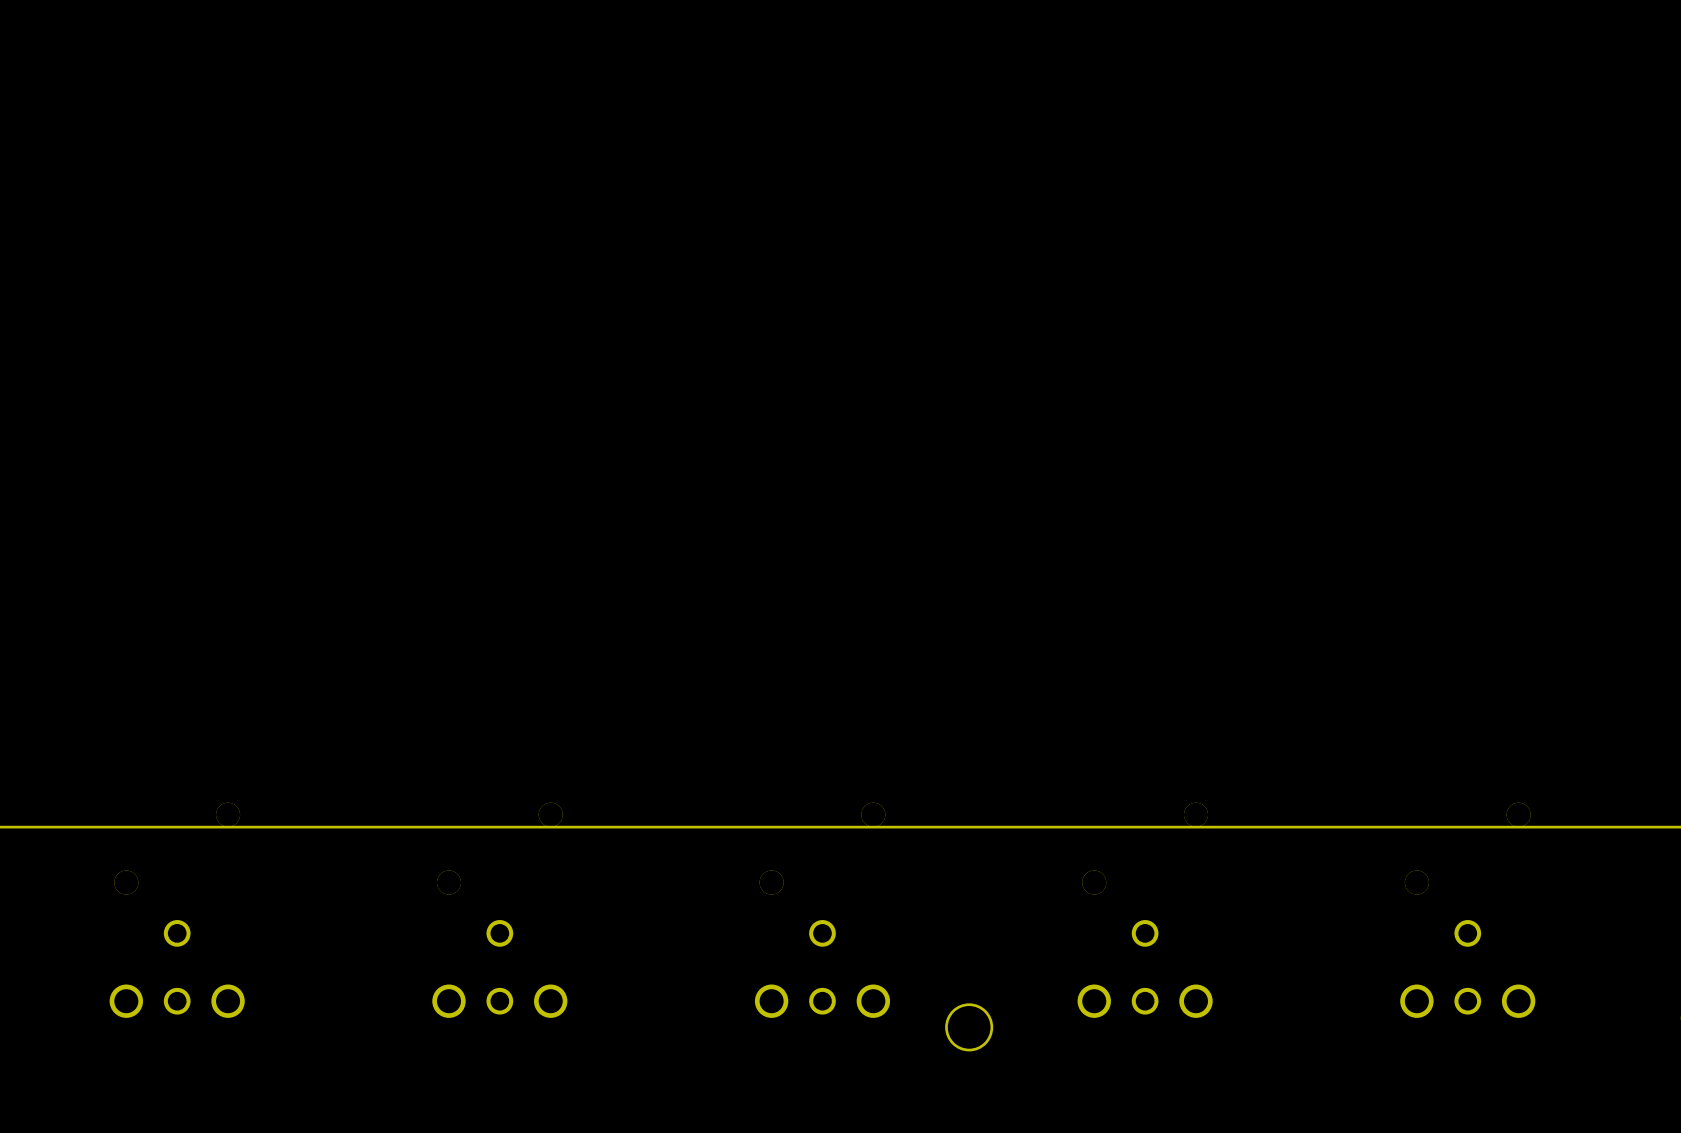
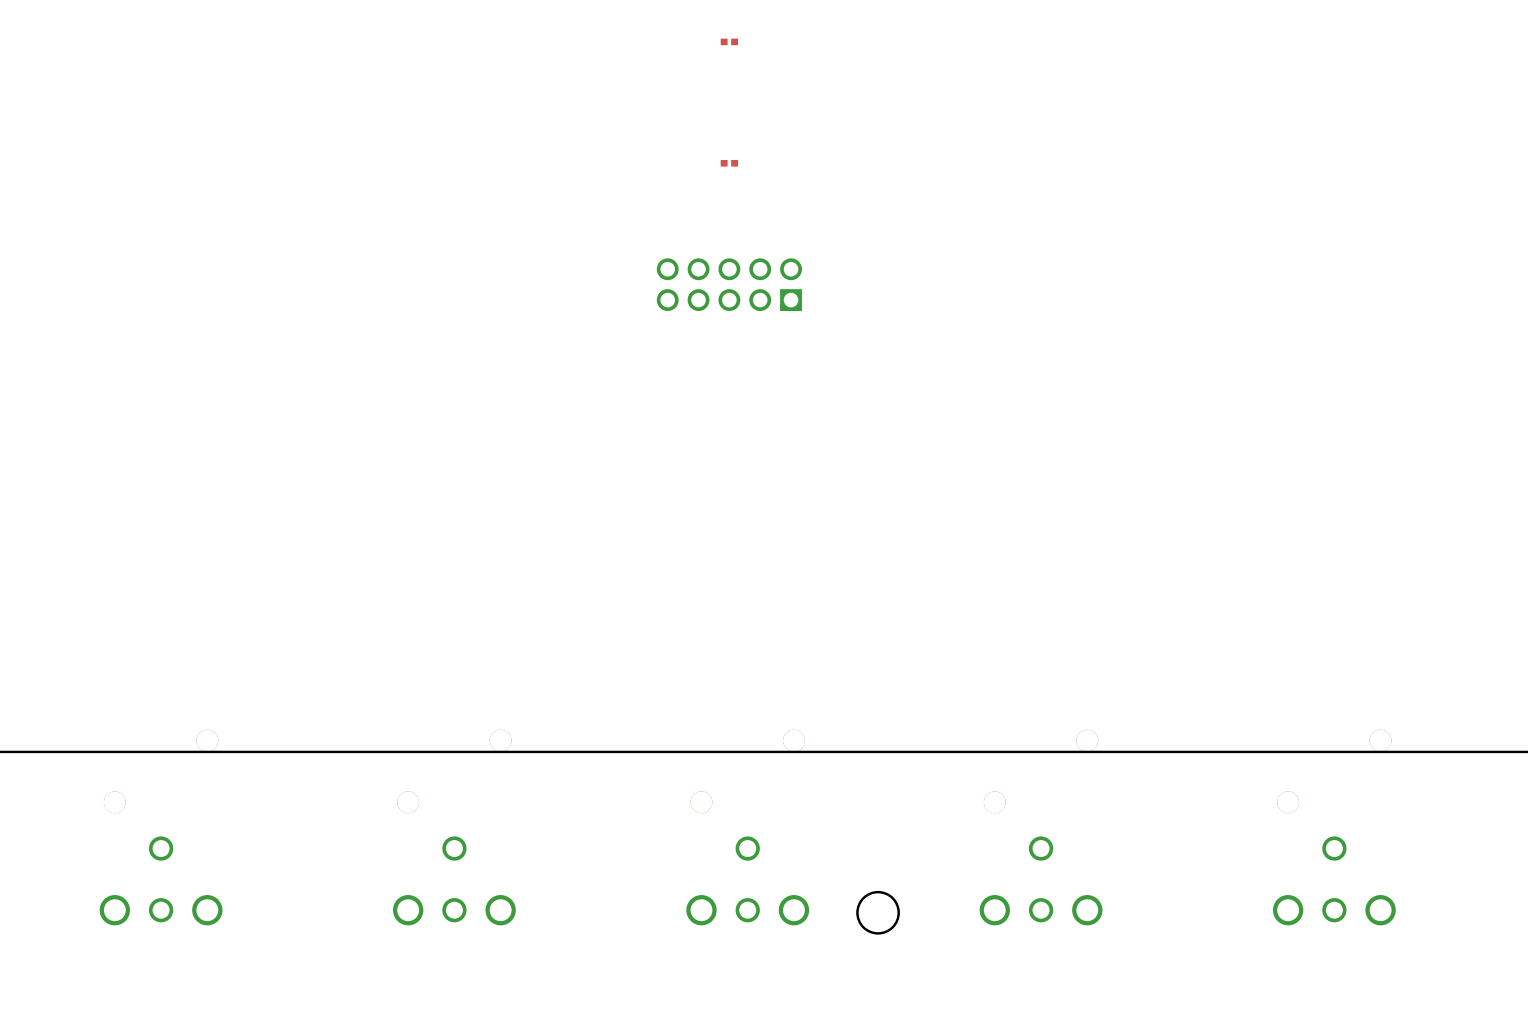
part: none -> (729, 41)
part: none -> (729, 163)
part: none -> (729, 284)
round board edge position: (969, 1027) -> (878, 912)

